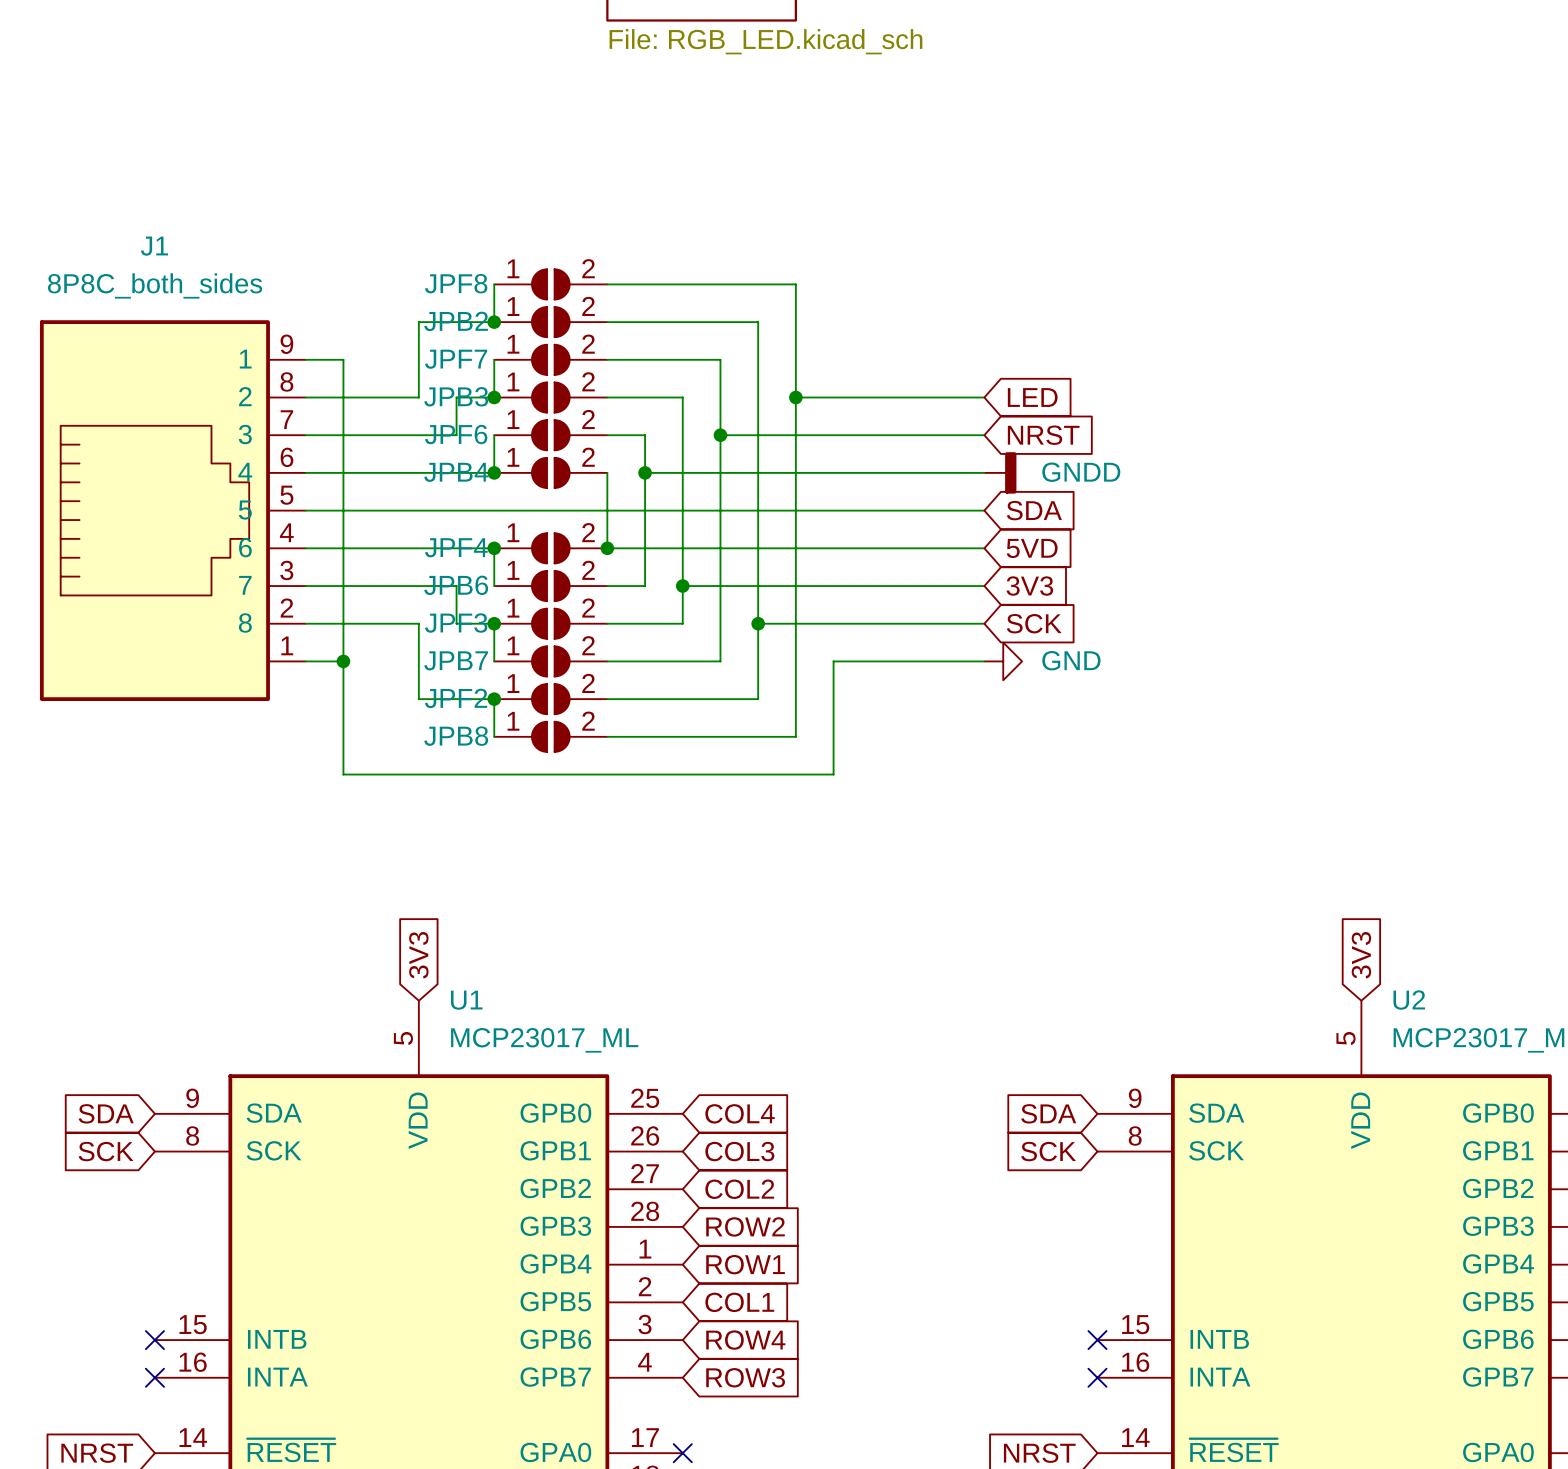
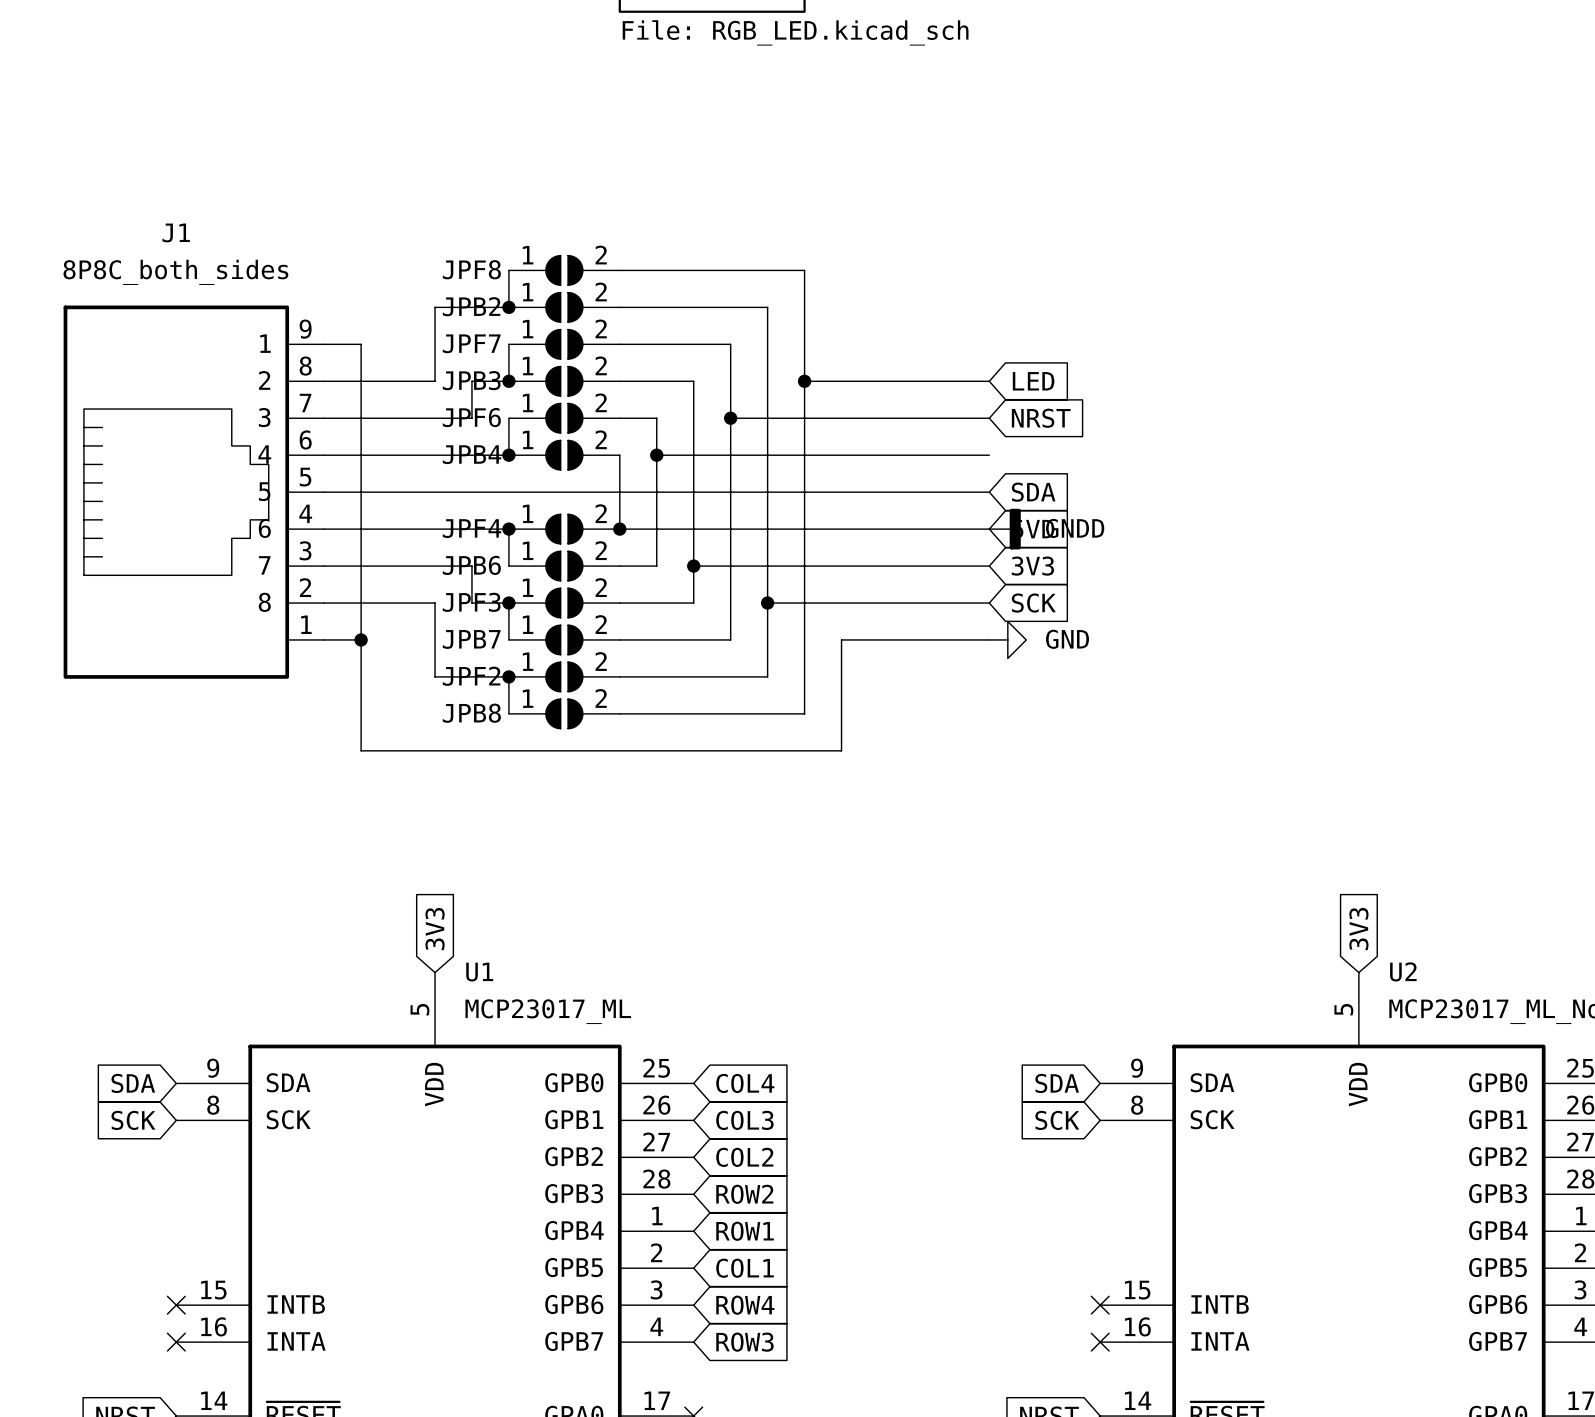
power symbol position: GNDD (1000, 472) -> GNDD (1005, 529)

